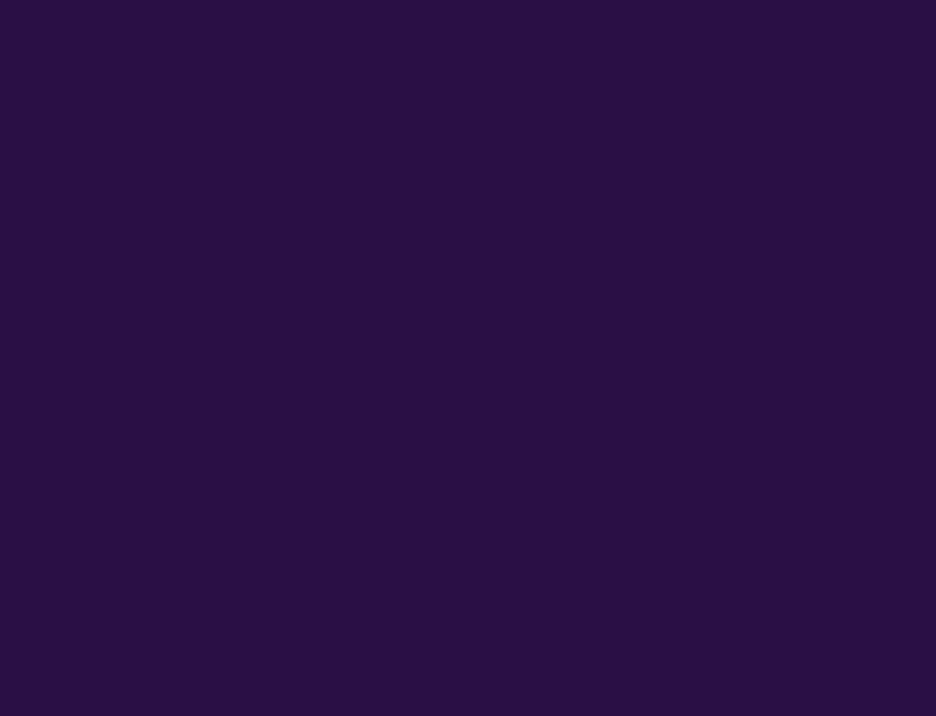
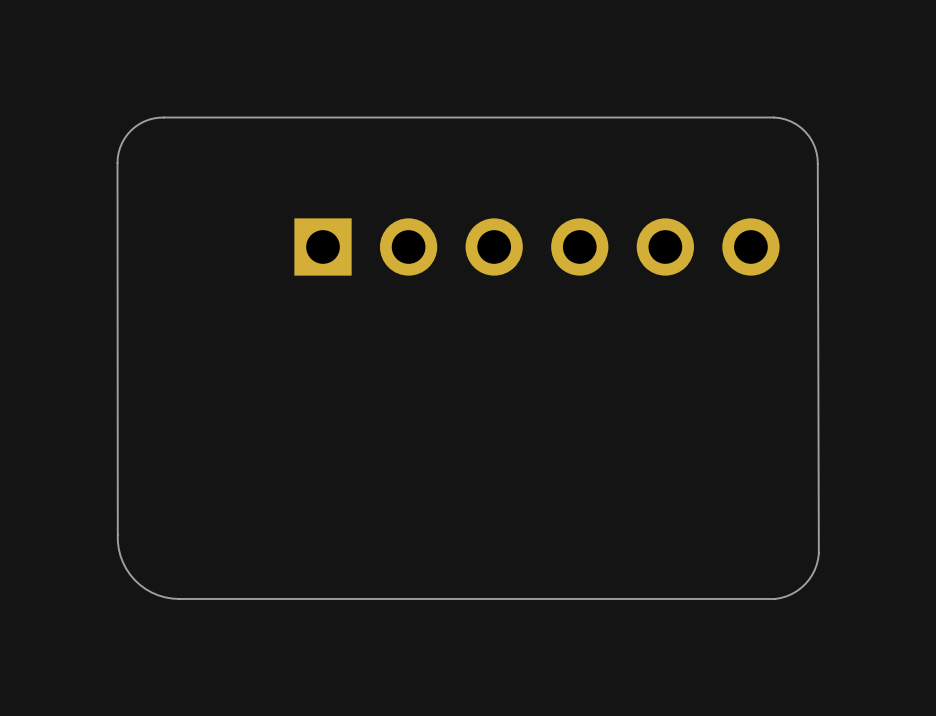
board edge: none -> (774, 117) (163, 117) (148, 119) (135, 127) (122, 142) (117, 162) (117, 541) (122, 562) (130, 574) (139, 584) (151, 592) (165, 597) (179, 598) (775, 598) (796, 591) (812, 575) (818, 553) (817, 158) (812, 141) (805, 131) (791, 121) (774, 117)
part: none -> (536, 246)

